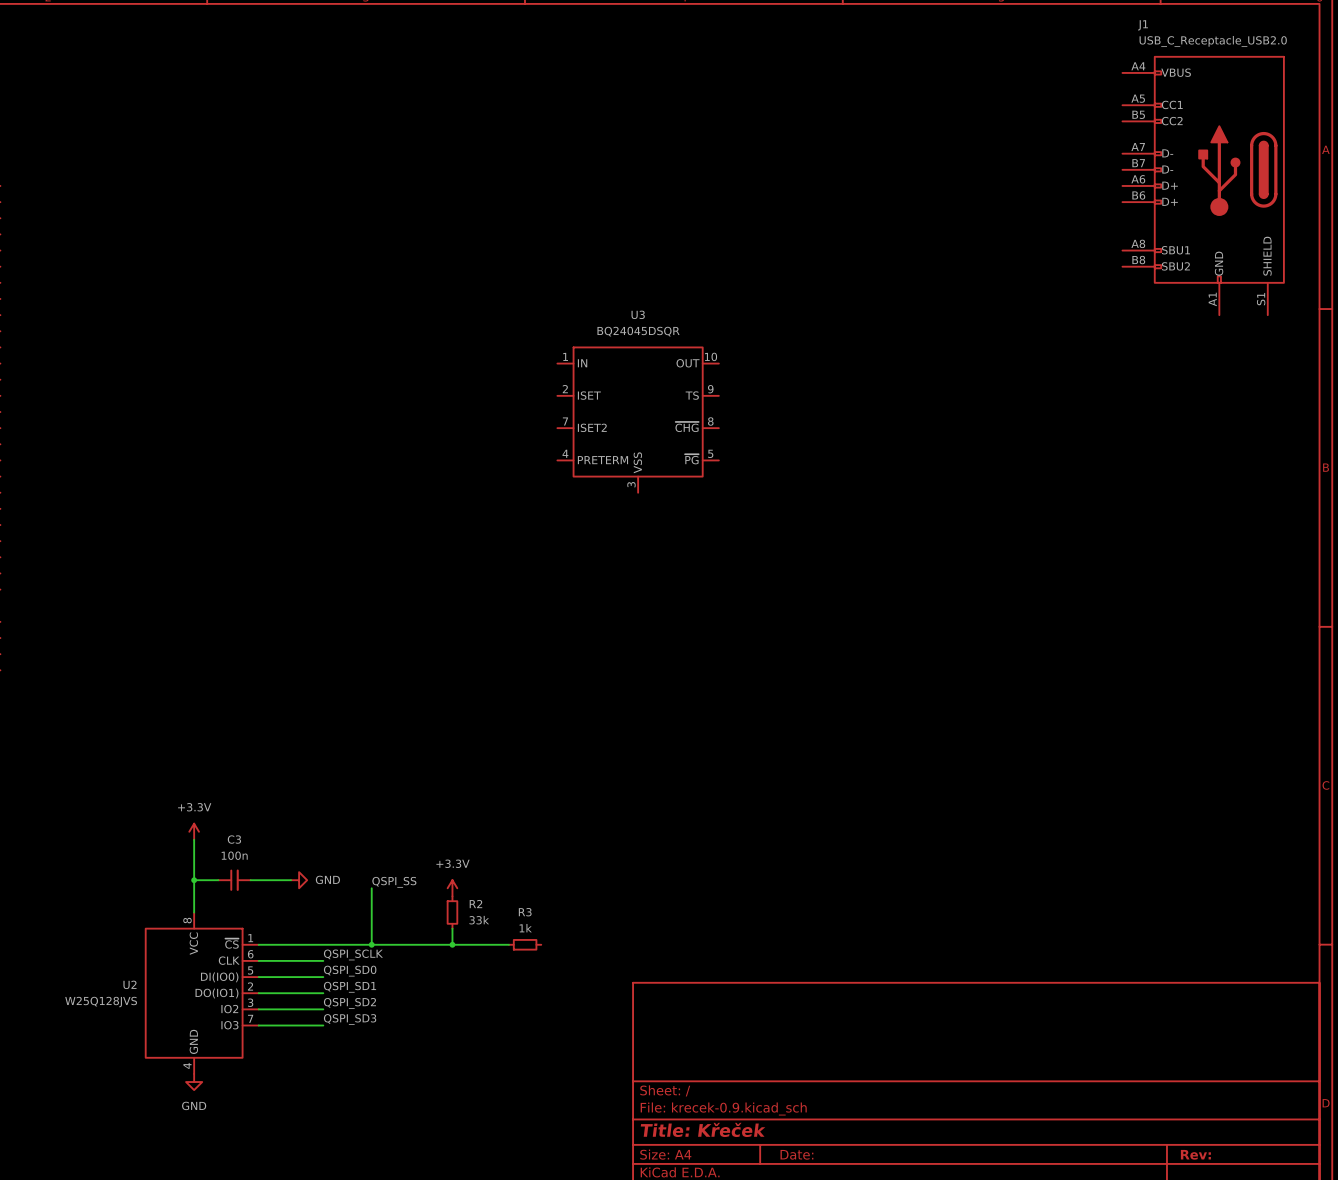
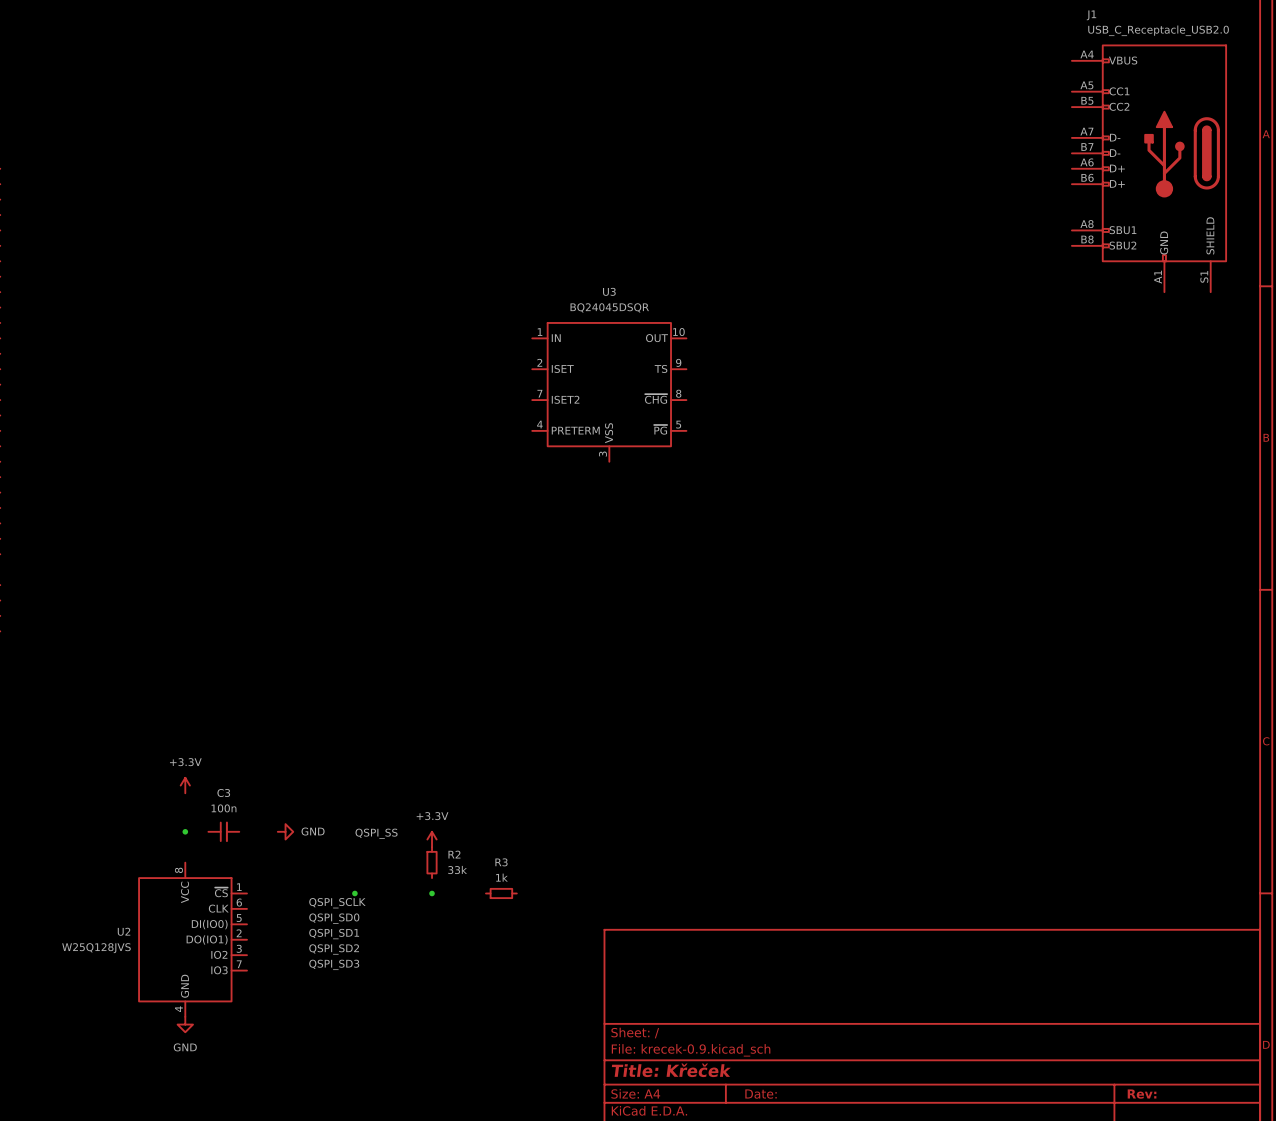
wire: (194, 839) (194, 912) -> none
wire: (194, 880) (218, 880) -> none
wire: (250, 880) (291, 880) -> none
wire: (371, 888) (371, 944) -> none
wire: (452, 928) (452, 944) -> none
wire: (258, 944) (508, 944) -> none
wire: (258, 960) (323, 960) -> none
wire: (258, 977) (323, 977) -> none
wire: (258, 993) (323, 993) -> none
wire: (258, 1009) (323, 1009) -> none
wire: (258, 1025) (323, 1025) -> none

